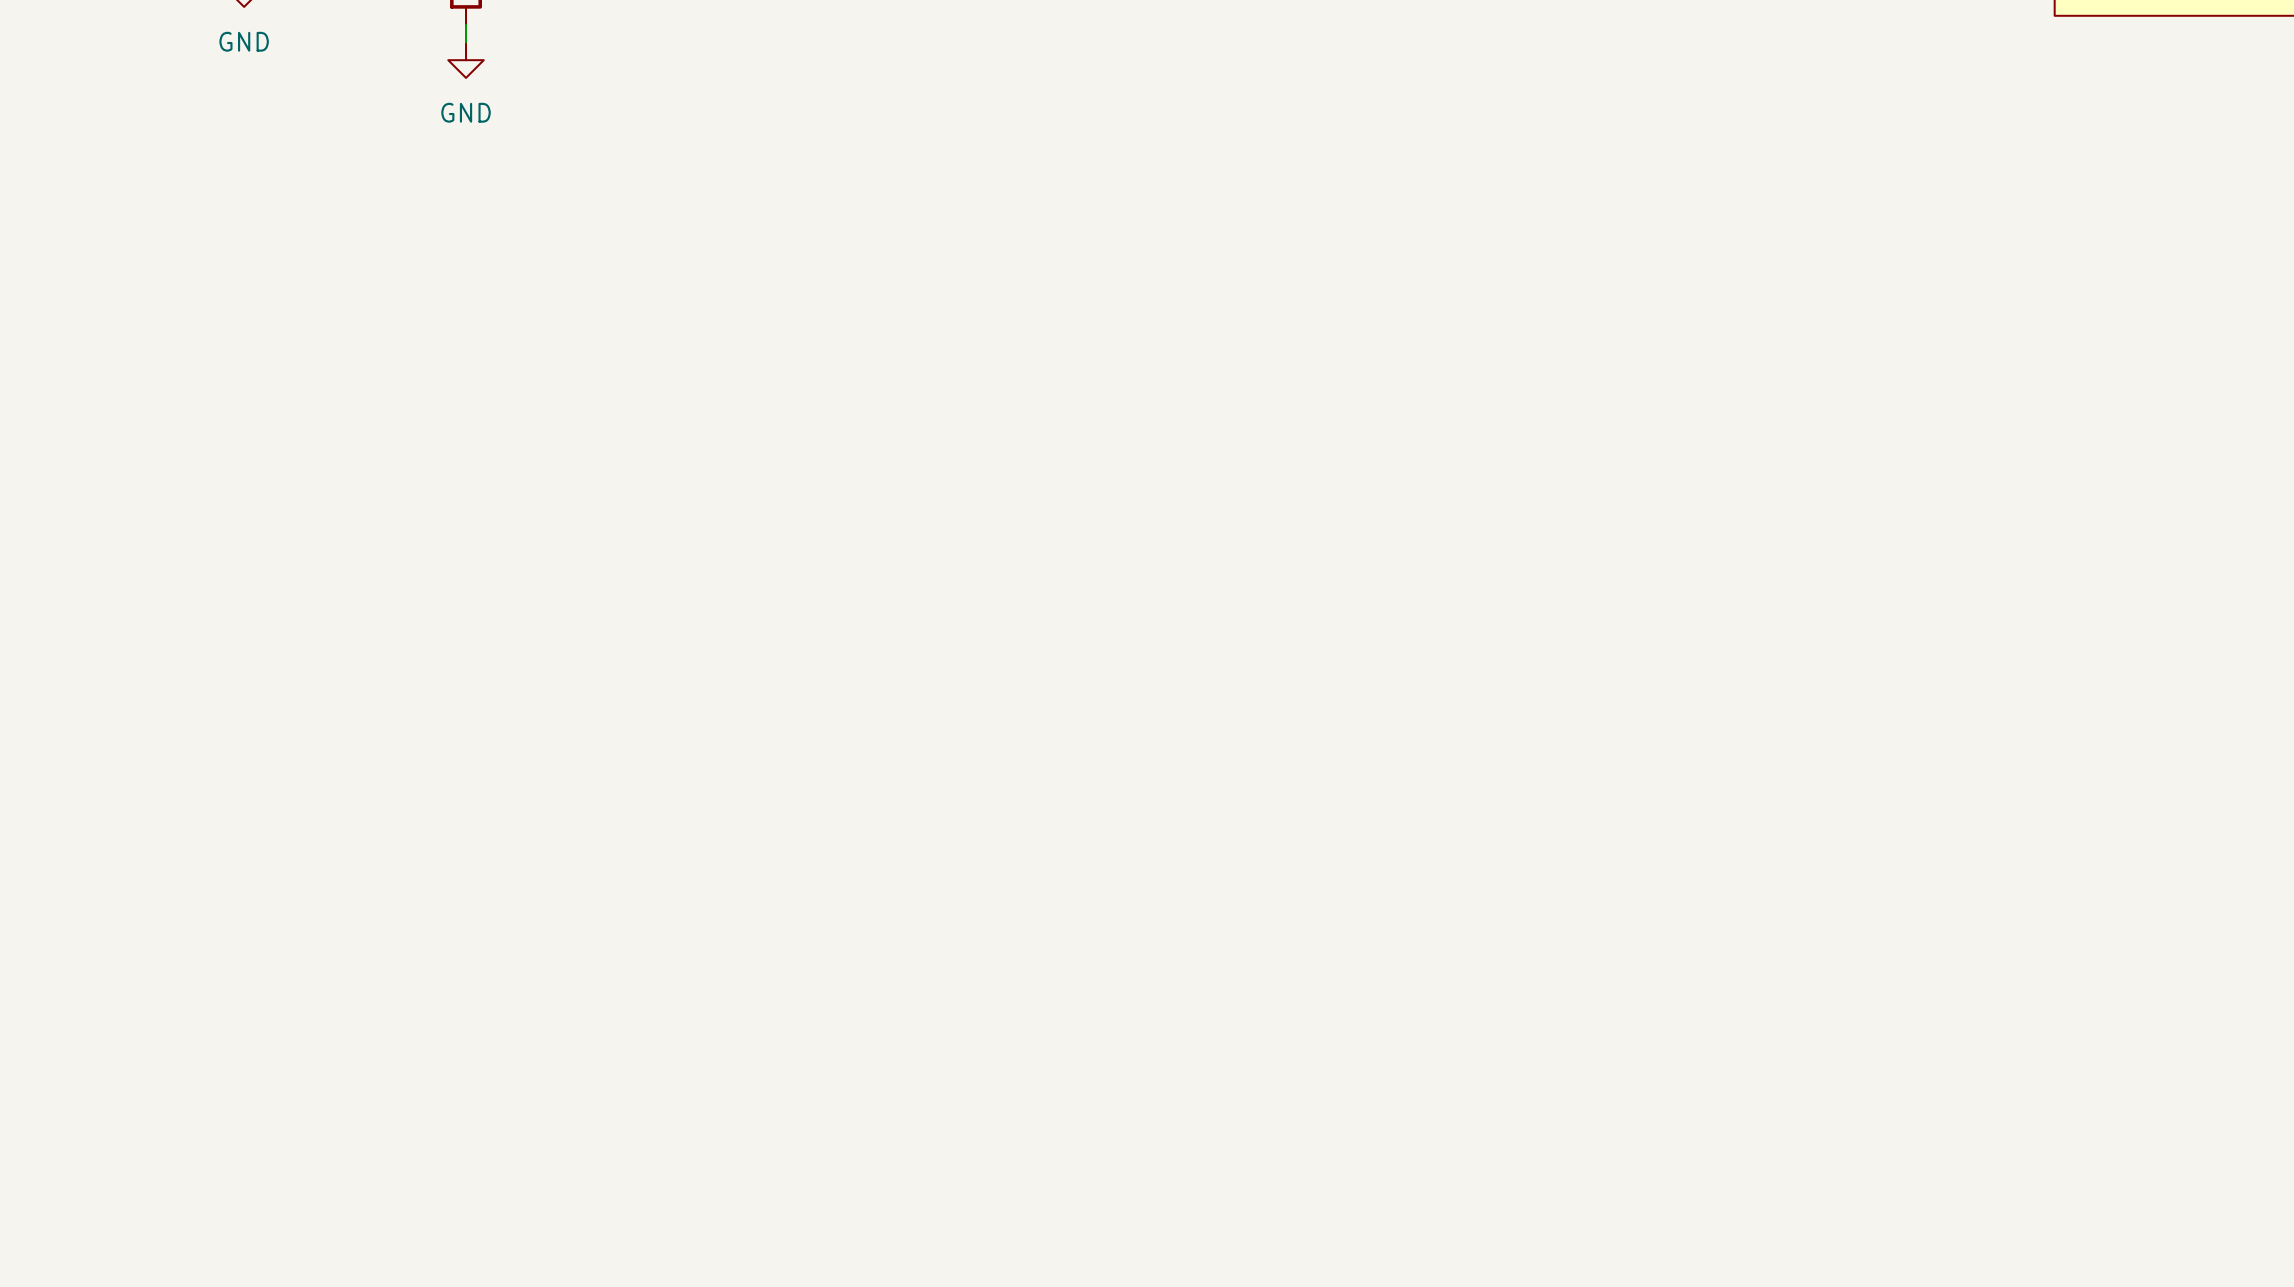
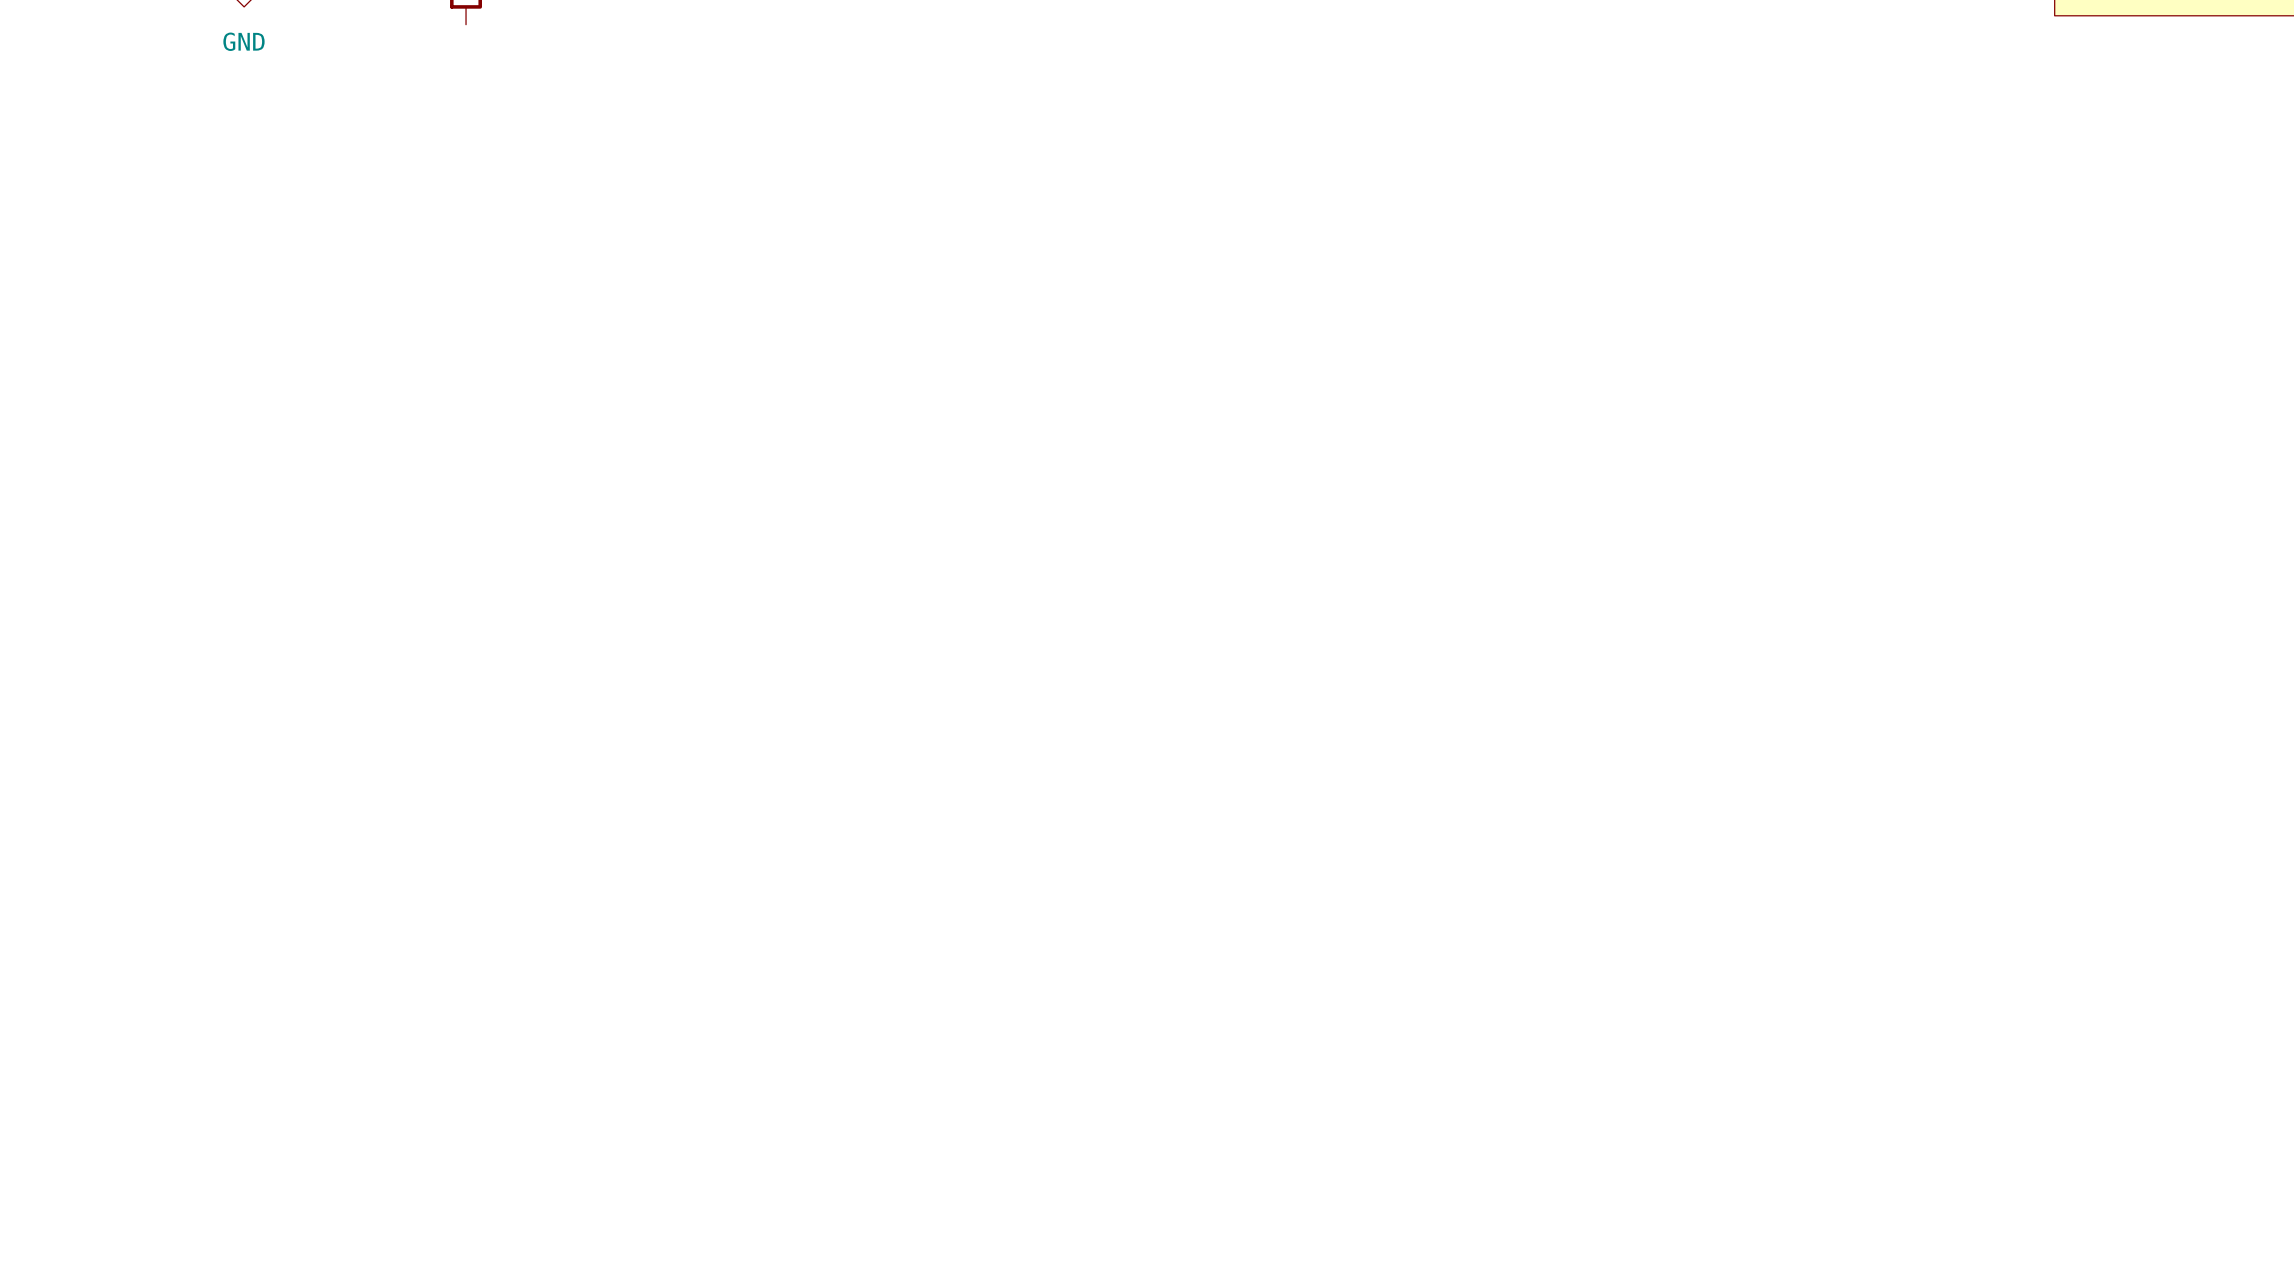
wire: (466, 24) (466, 42) -> none
power symbol: GND (466, 60) -> none

